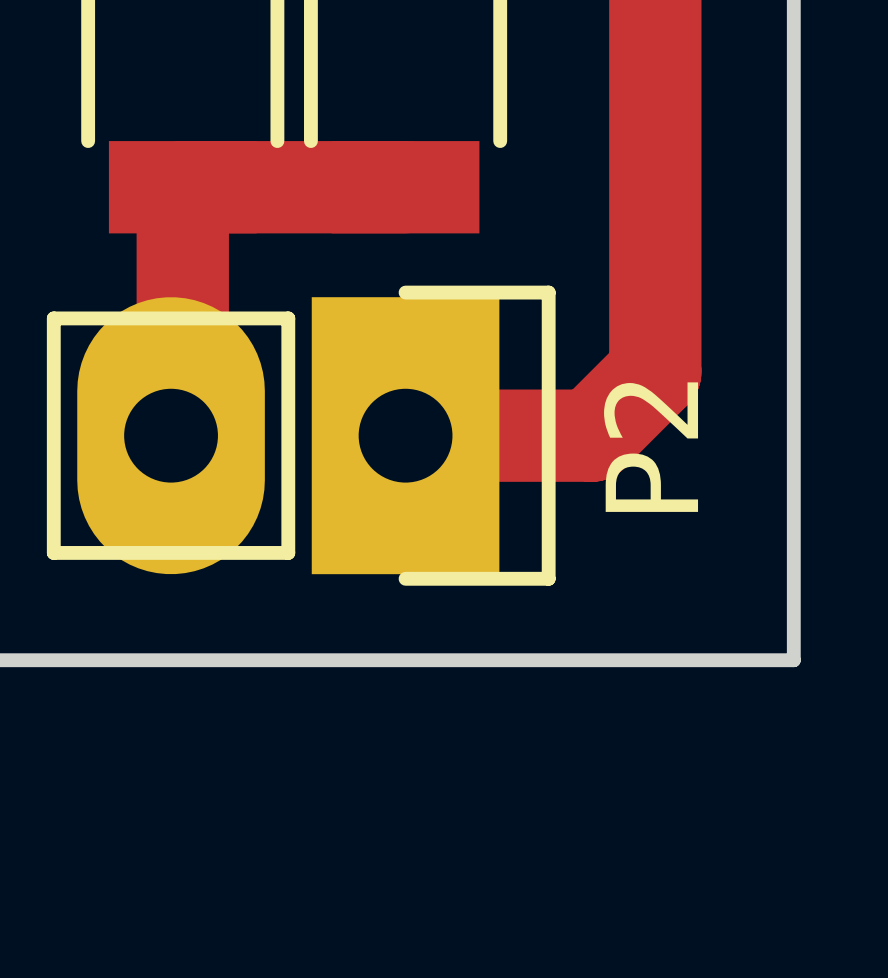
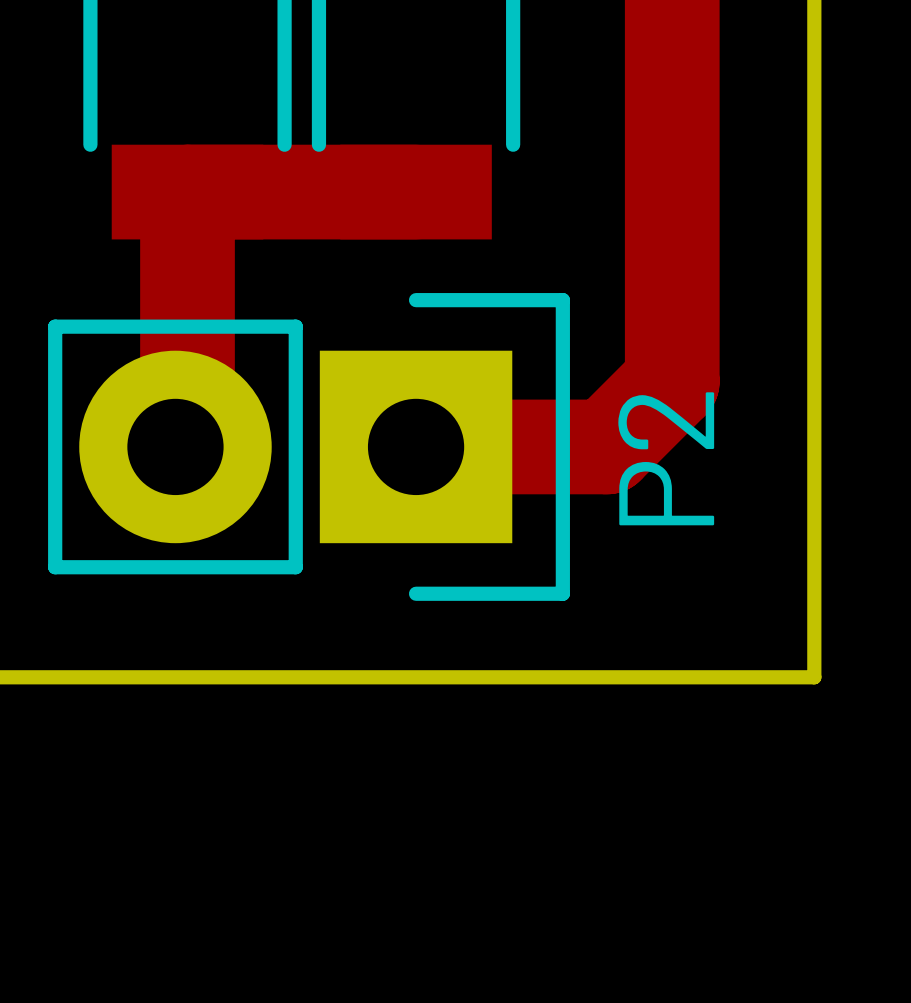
P2 footprint: [46, 285, 556, 586] -> [48, 293, 570, 601]

